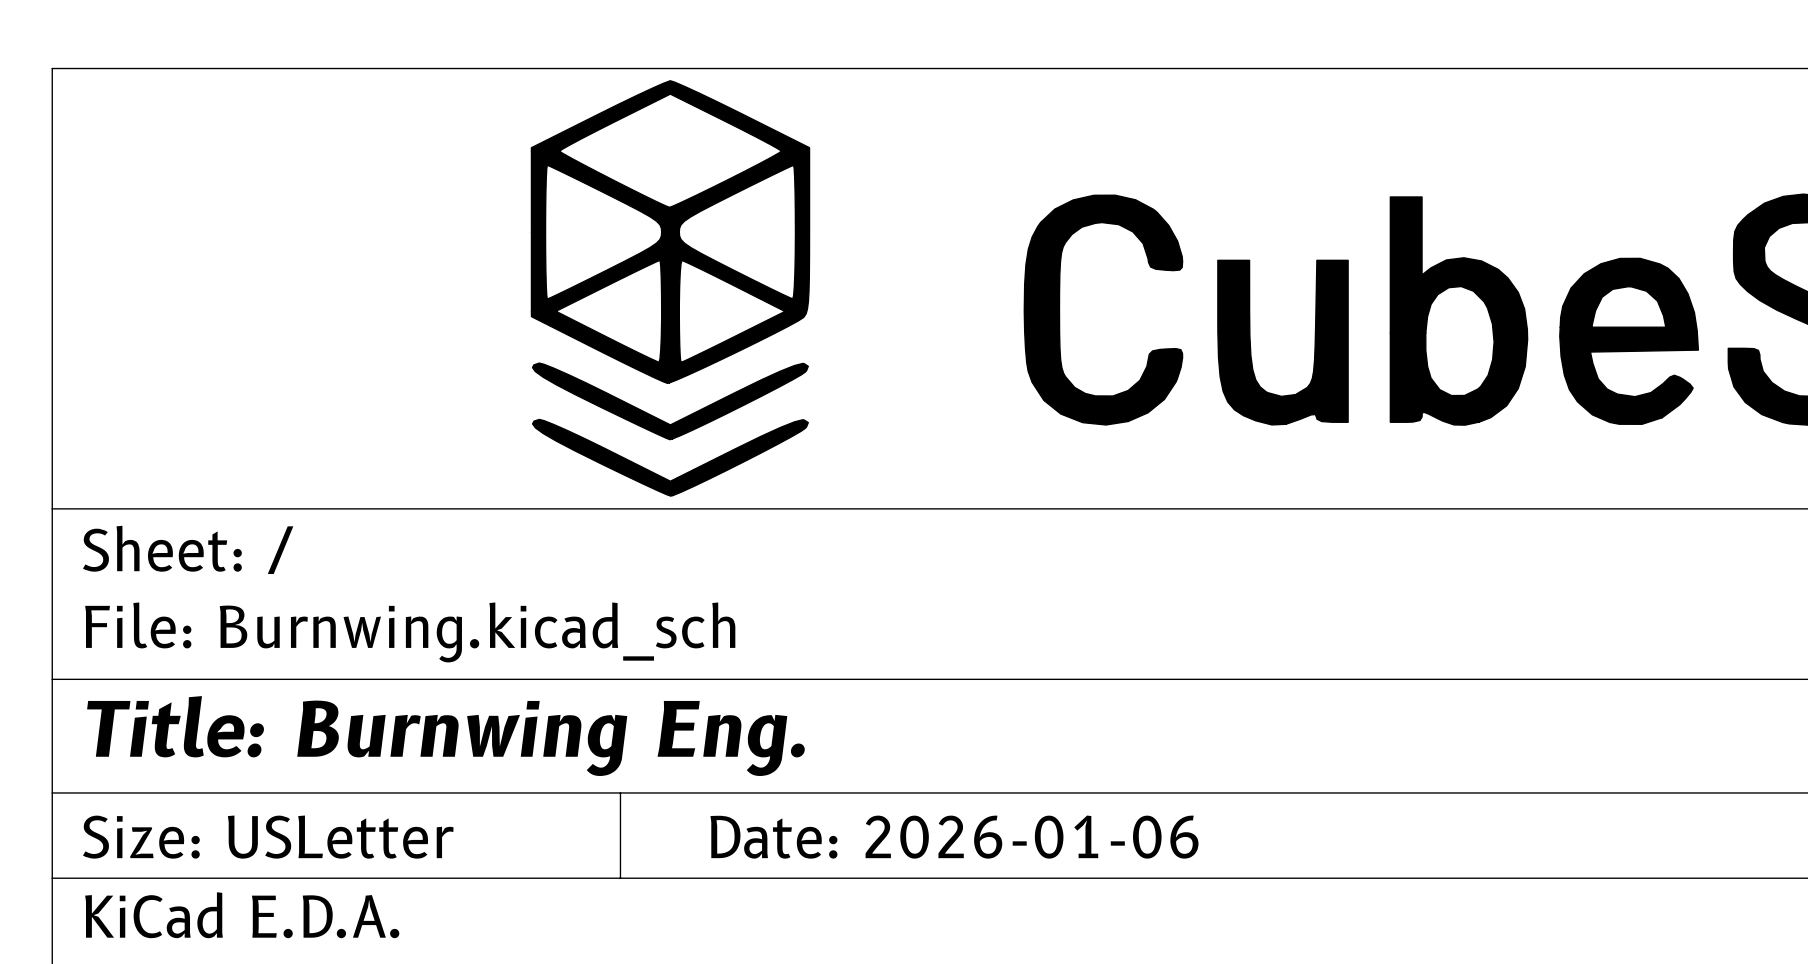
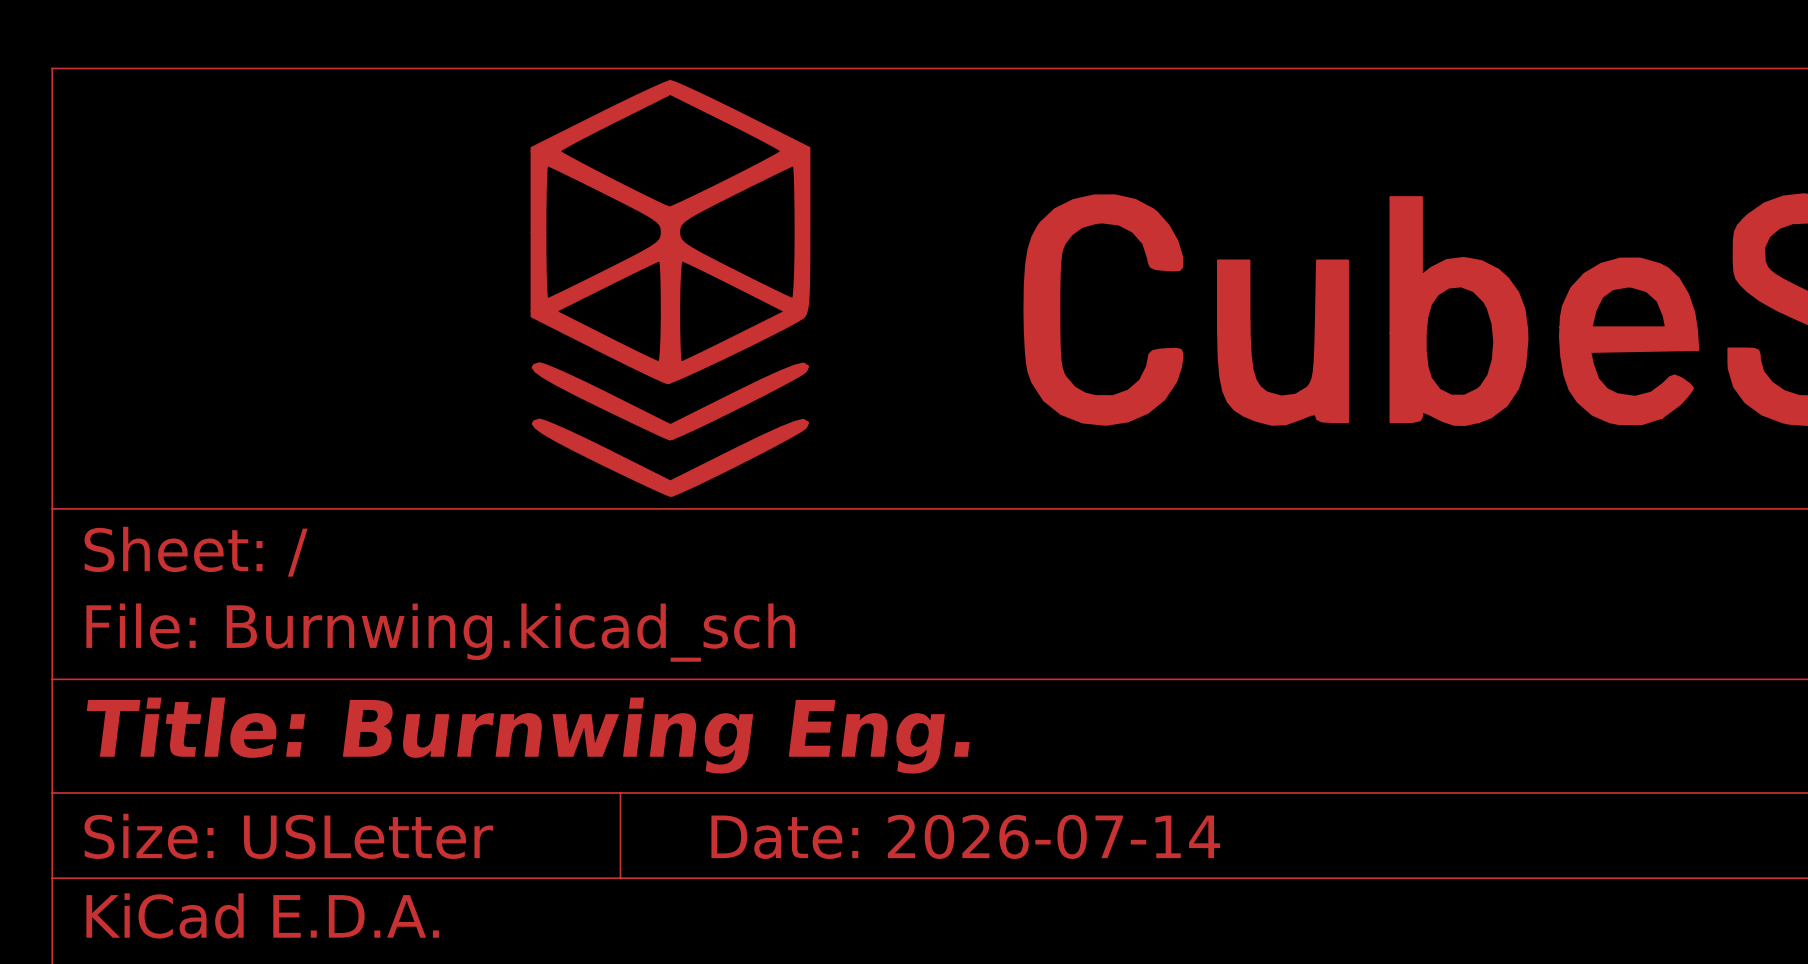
title block: Date: 2026-01-06 (954, 837) -> Date: 2026-07-14 (965, 836)

